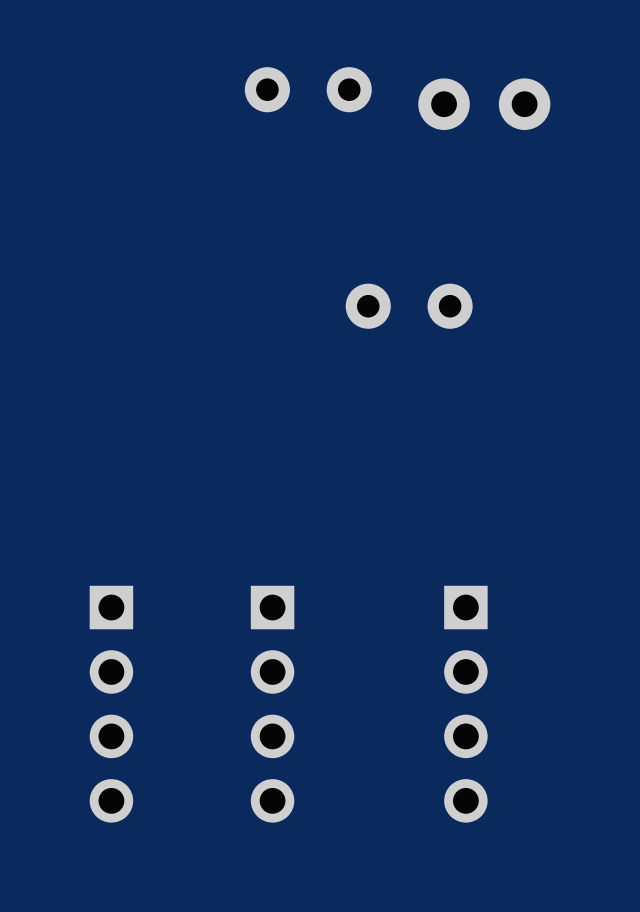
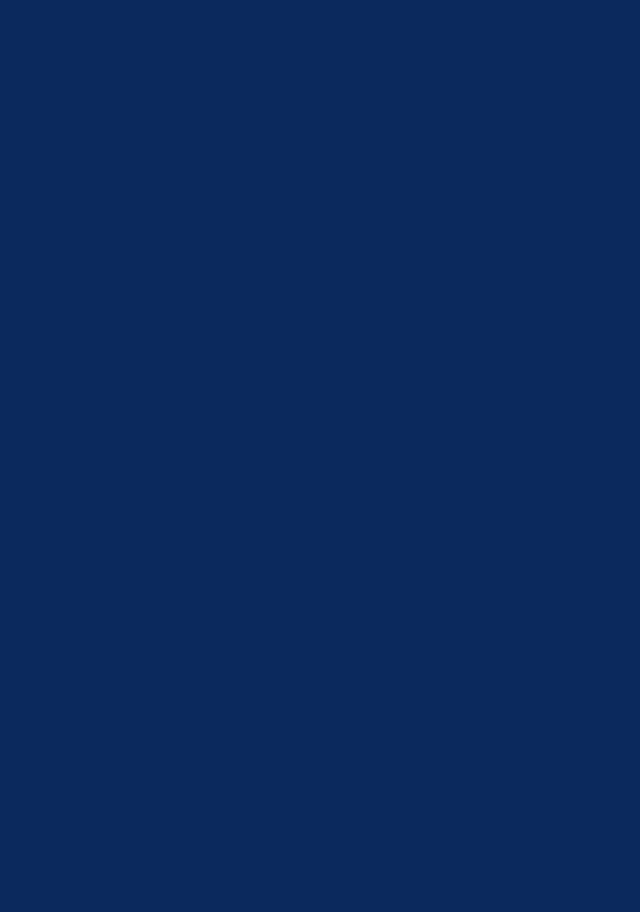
part: (308, 89) -> none
part: (484, 104) -> none
part: (409, 306) -> none
part: (111, 704) -> none
part: (272, 704) -> none
part: (465, 704) -> none

